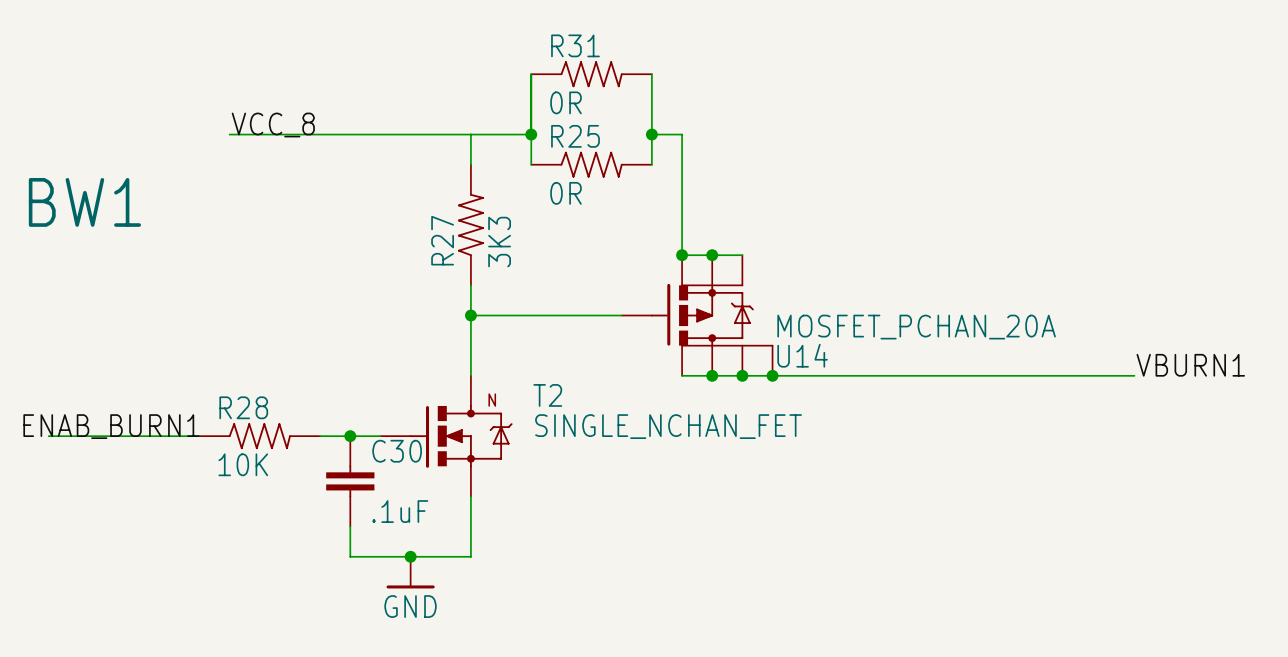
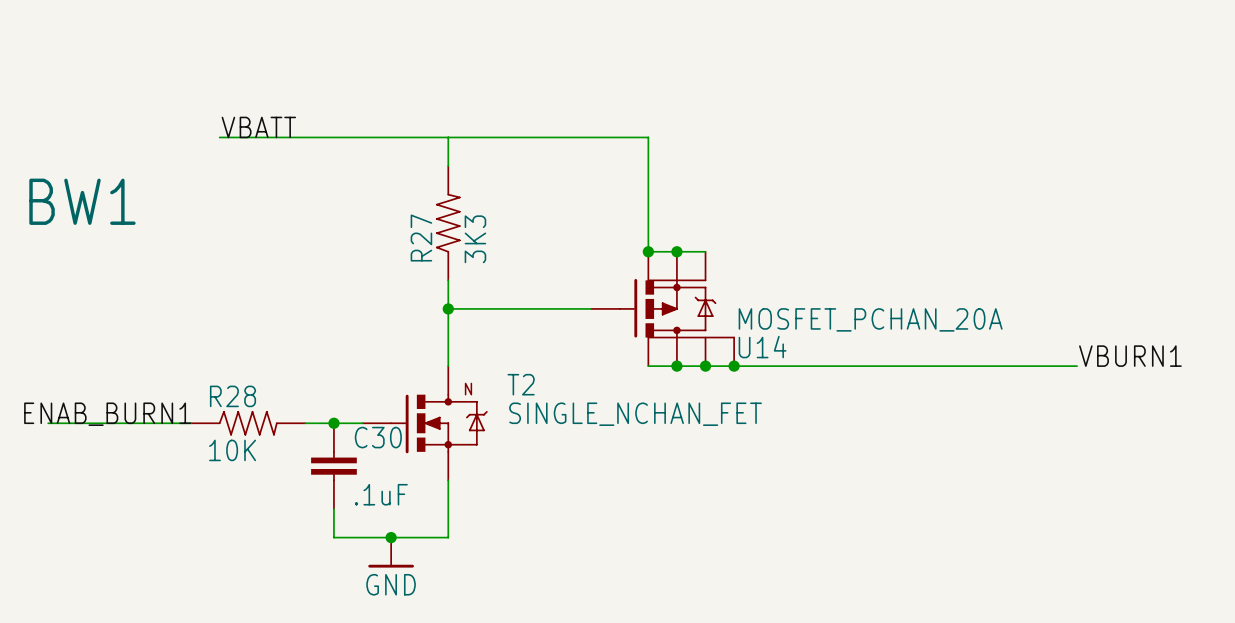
wire: (531, 74) (531, 164) -> none
R31: 0R (591, 74) -> none
wire: (651, 74) (651, 164) -> none
label: VCC_8 (273, 125) -> VBATT (258, 127)
wire: none -> (505, 137) (619, 137)
junction: (531, 134) -> none
junction: (651, 134) -> none
R25: 0R (591, 164) -> none

